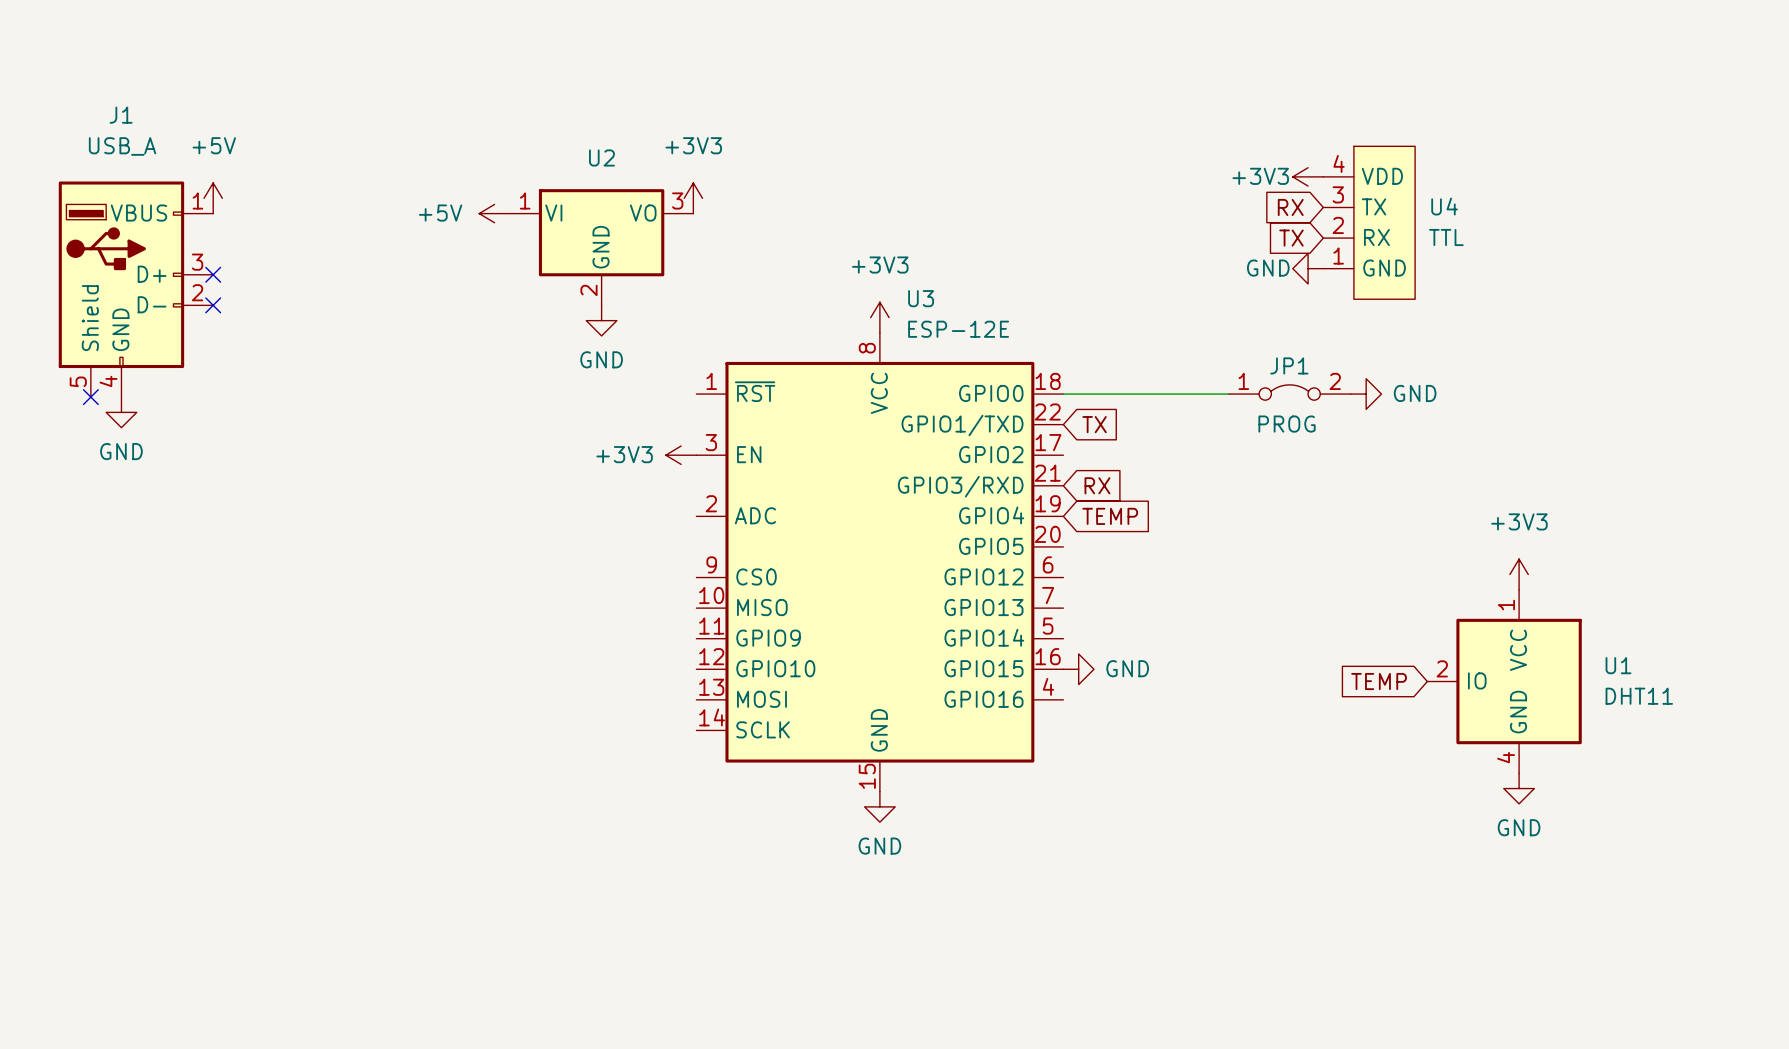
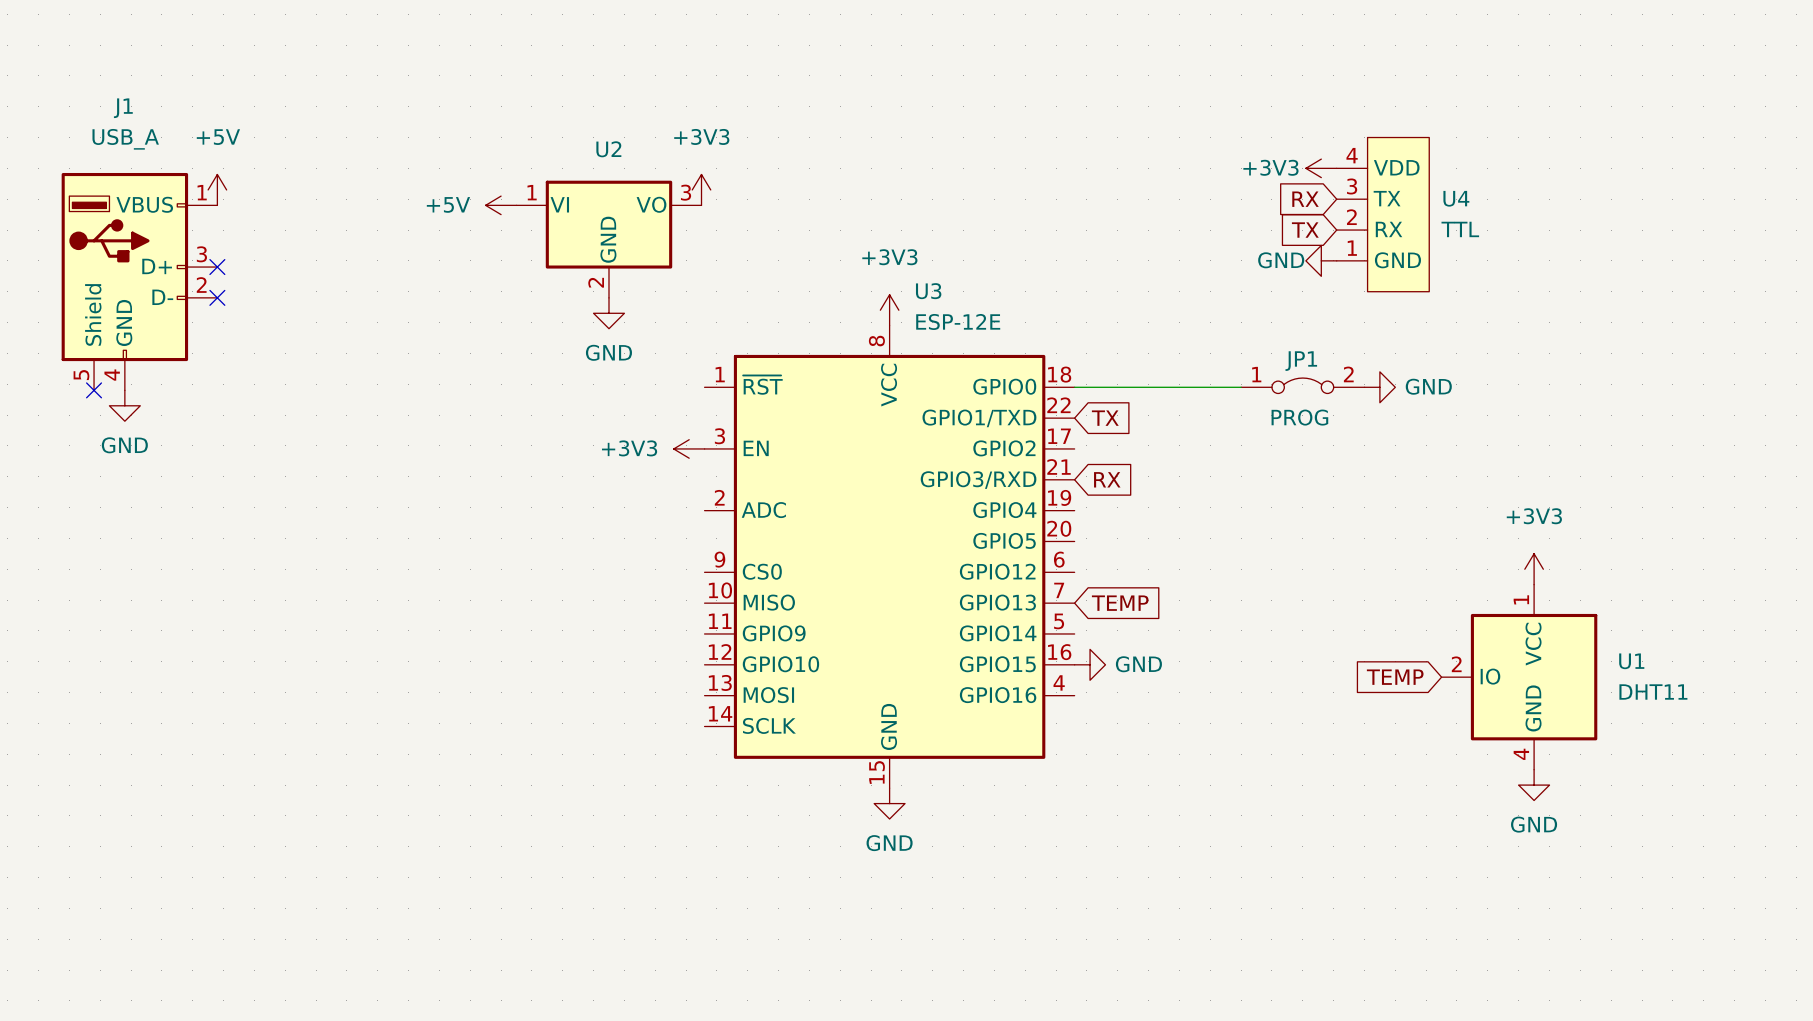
global label position: TEMP (1110, 516) -> TEMP (1120, 603)

